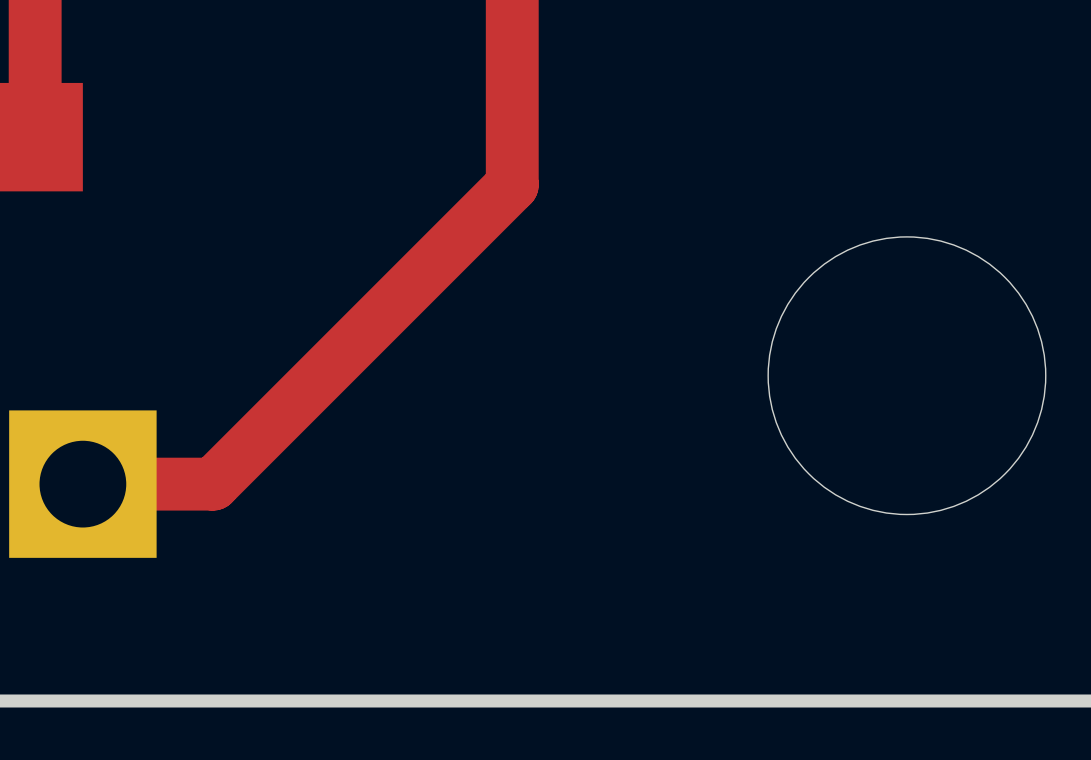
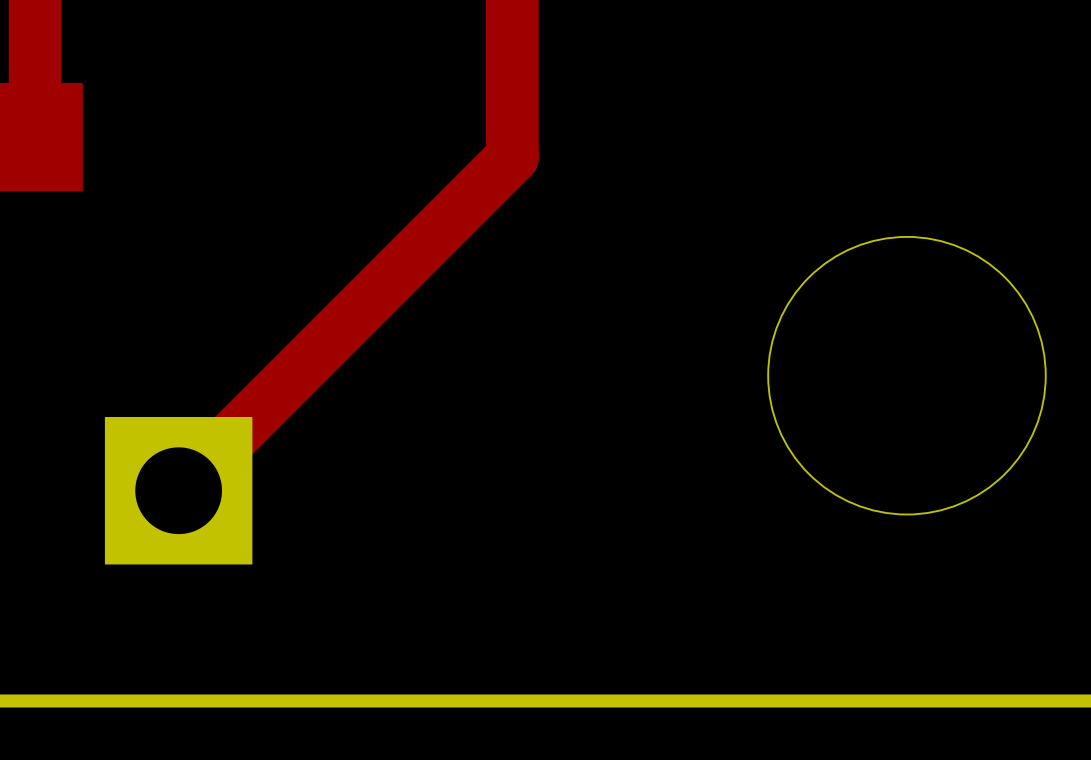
top track: (512, 157) (512, 184) (213, 484) (82, 484) -> (512, 157) (178, 490)
part position: (82, 484) -> (178, 490)

